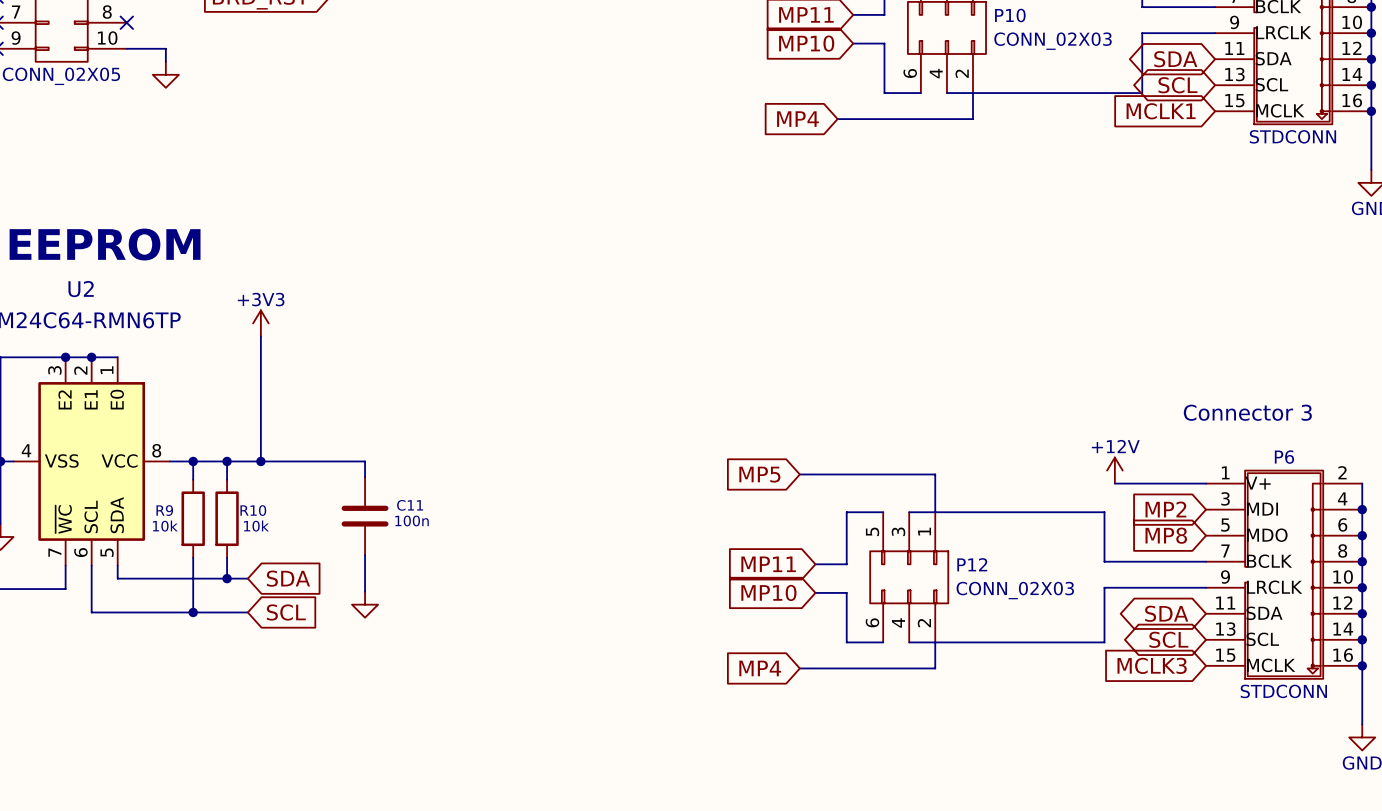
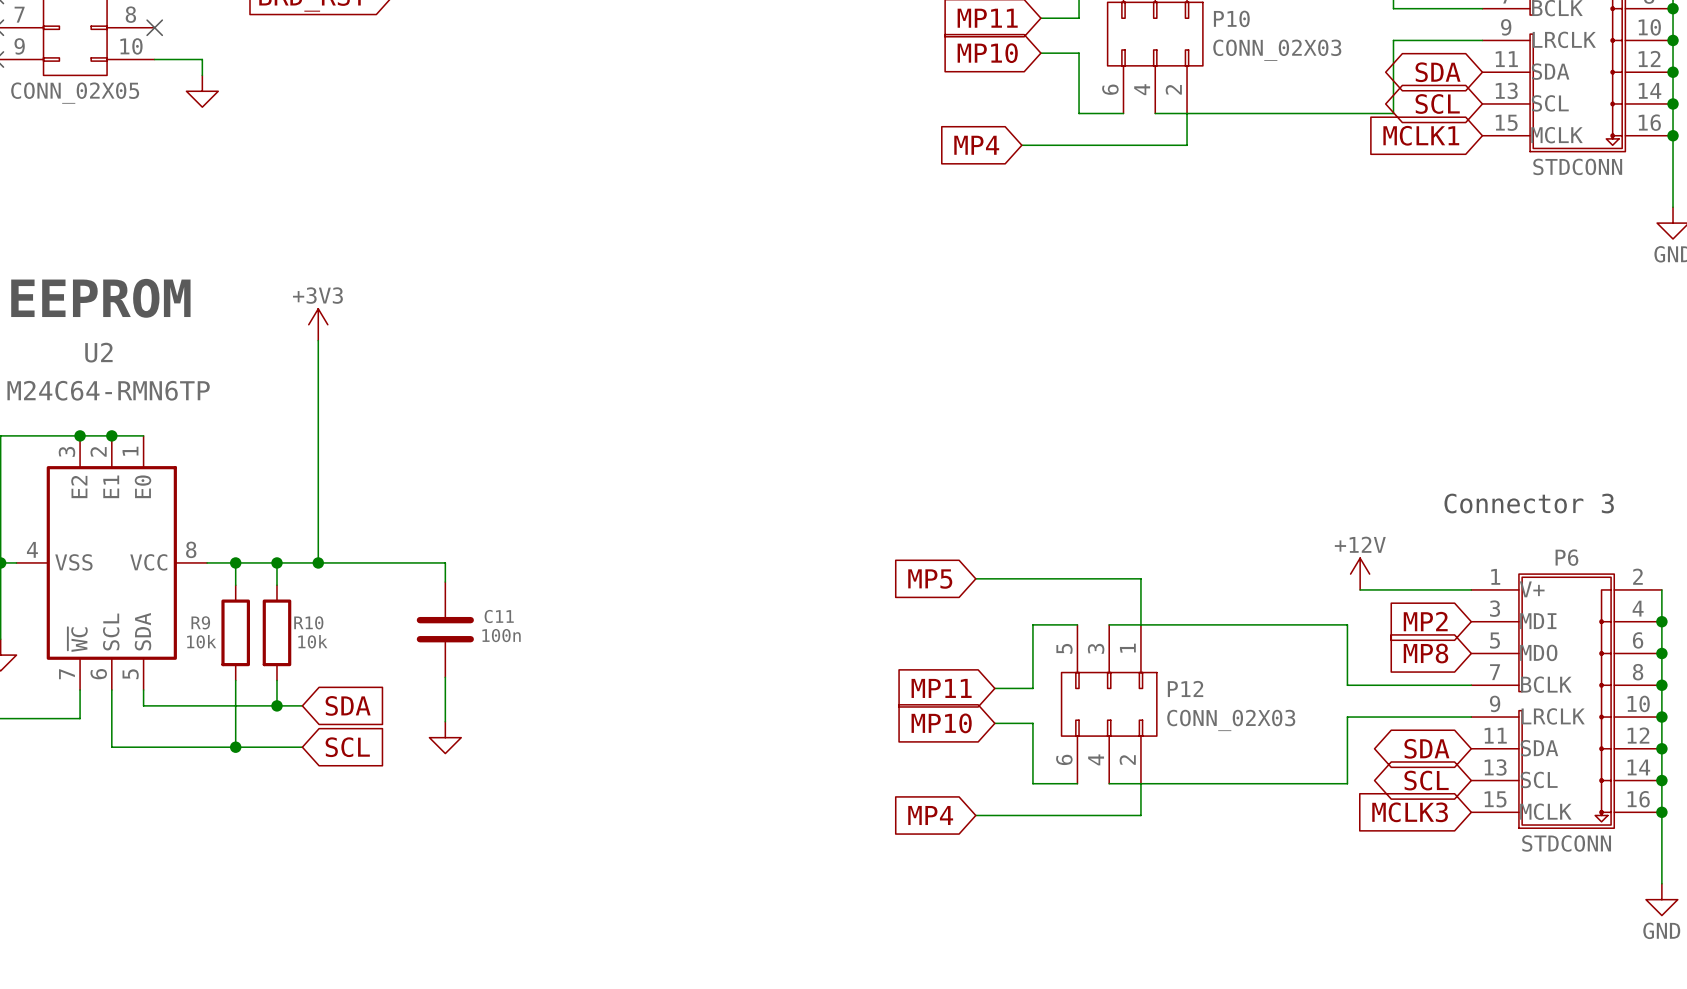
wire: none -> (318, 340) (318, 410)
power symbol position: +3V3 (260, 323) -> +3V3 (318, 324)

